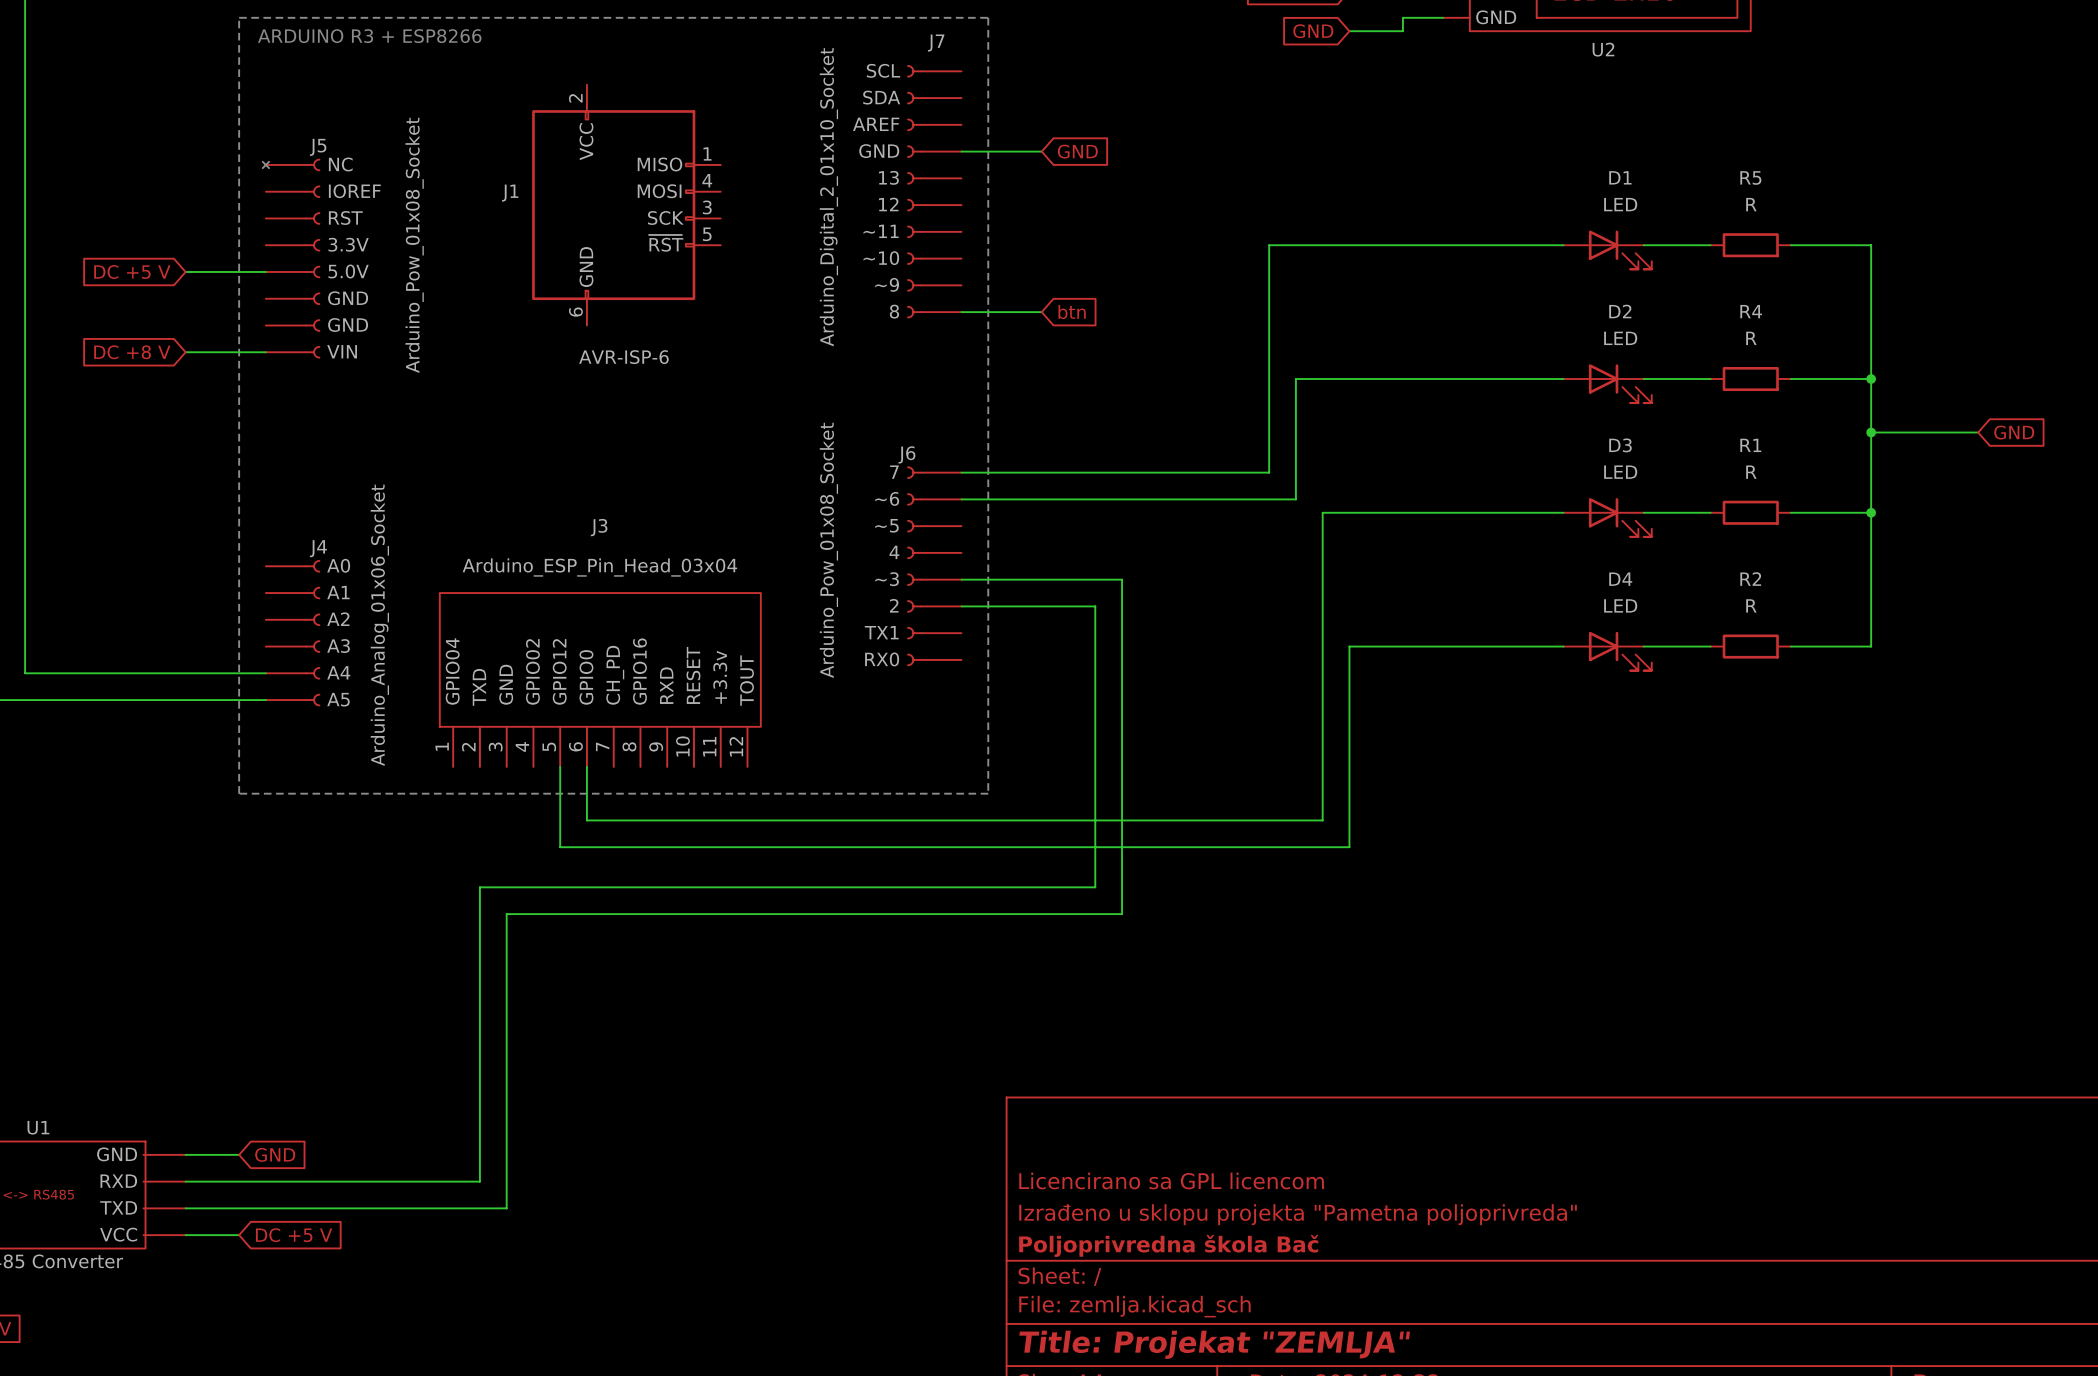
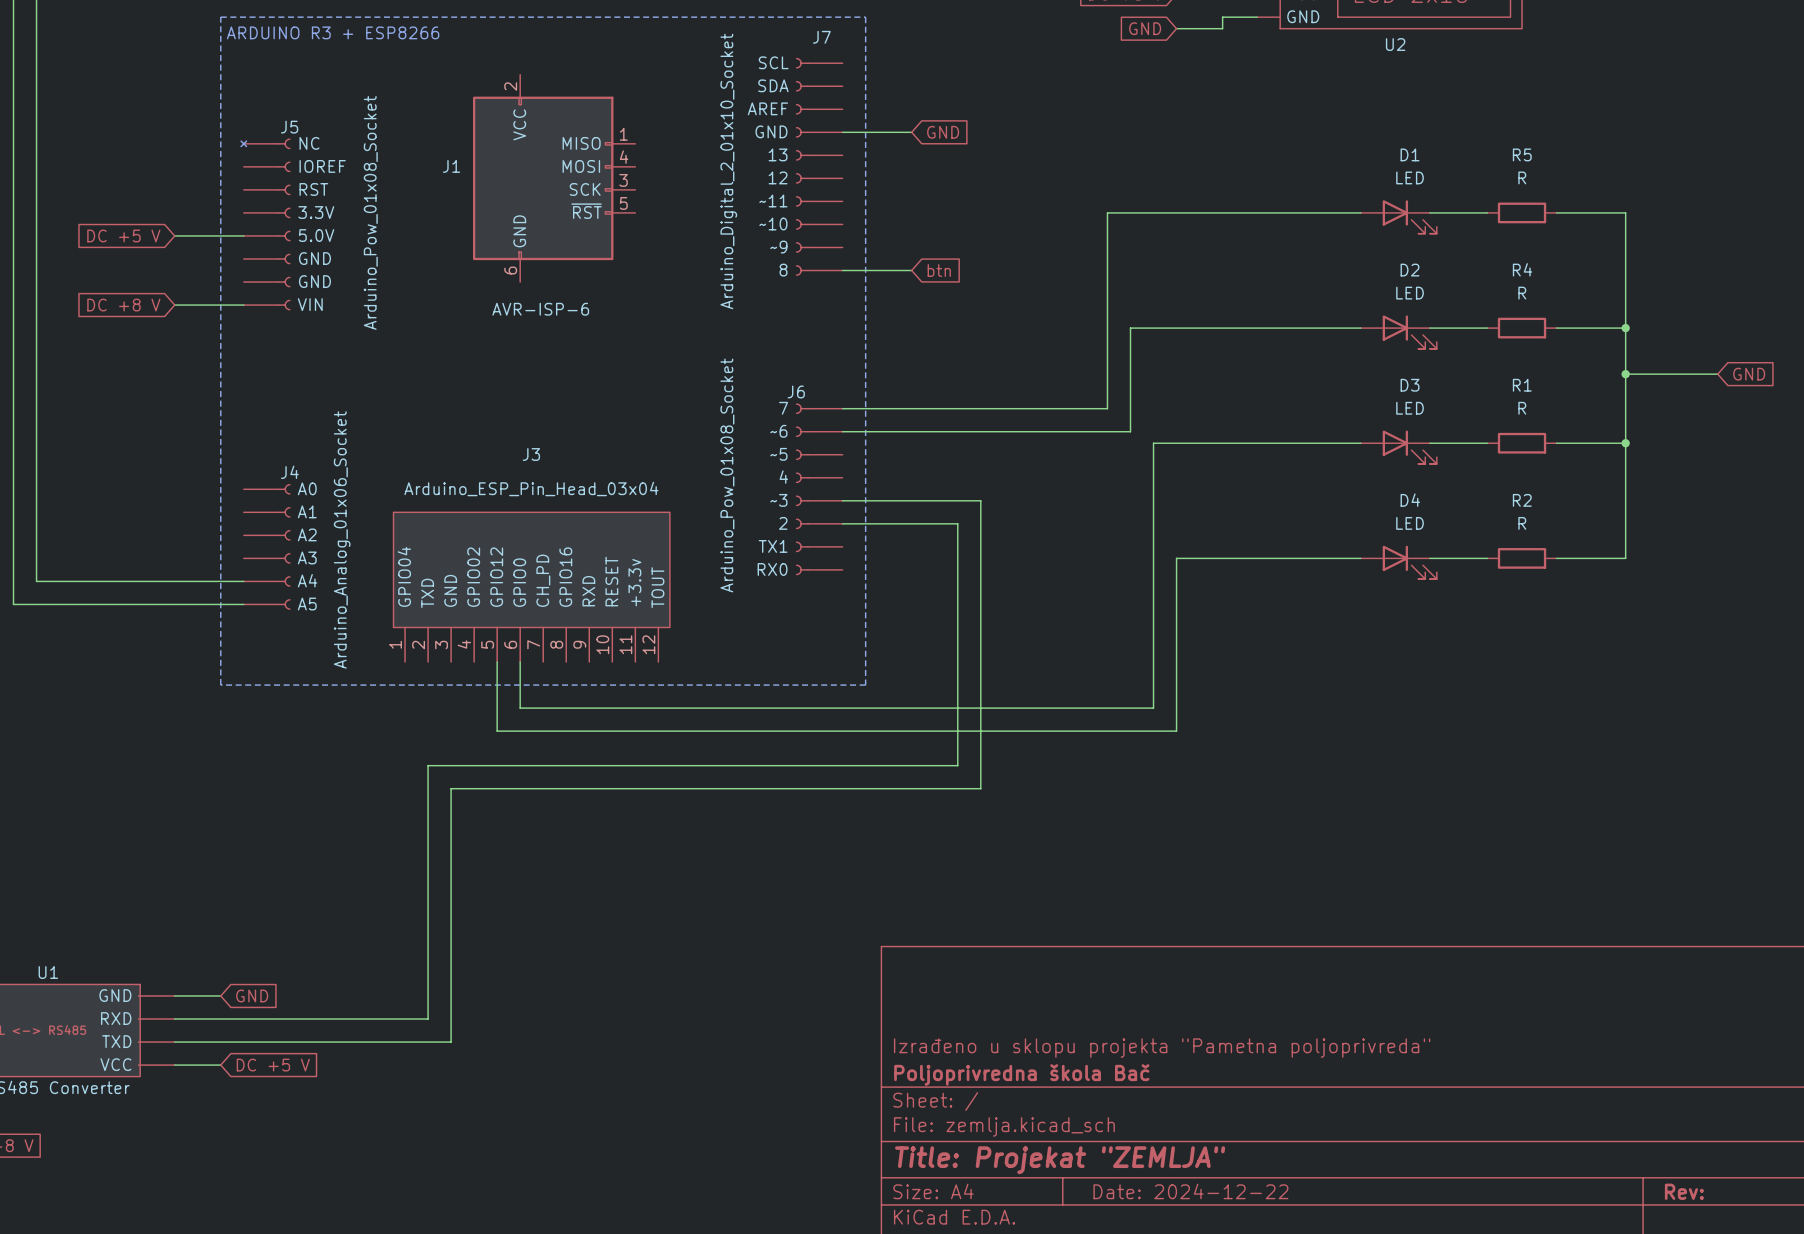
title block: Licencirano sa GPL licencom (1171, 1180) -> none

